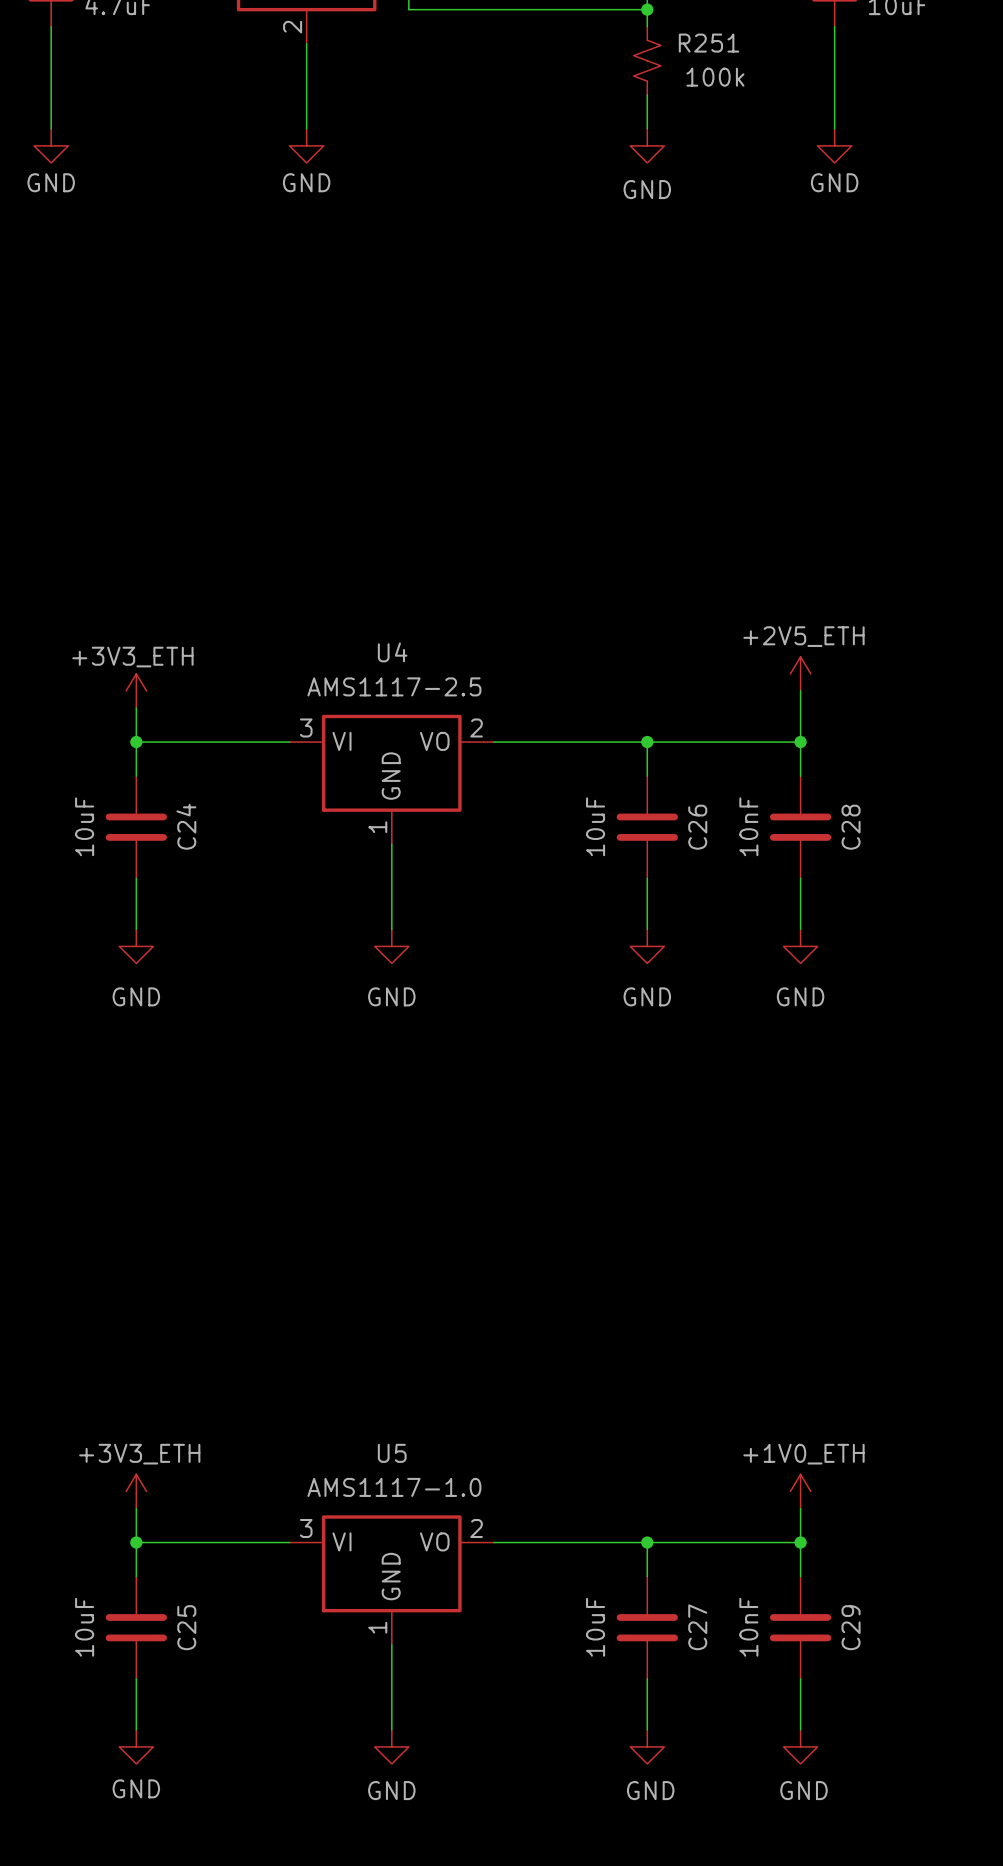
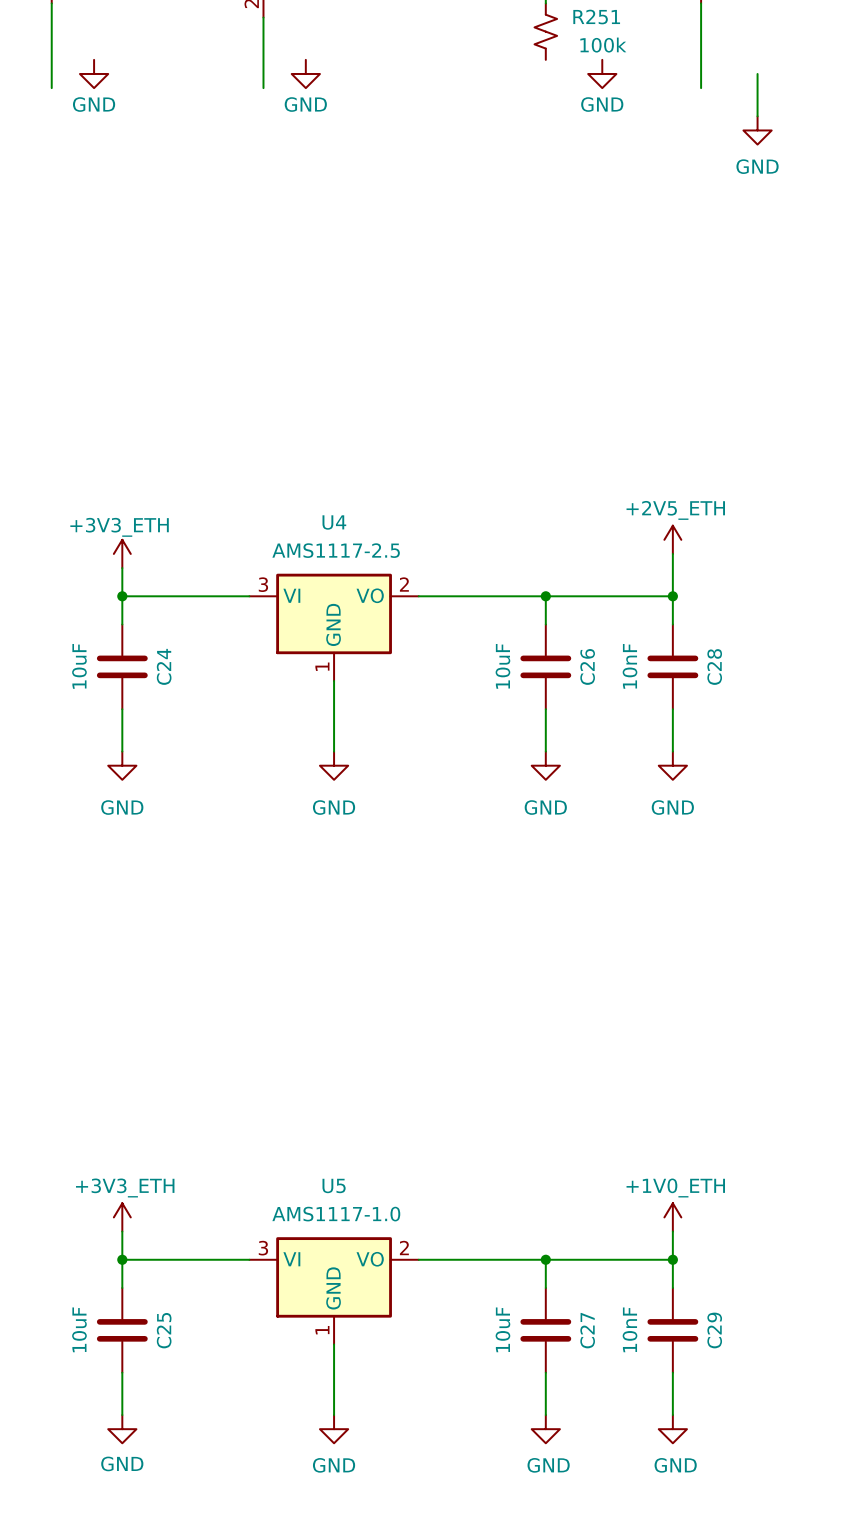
wire: (647, 94) (647, 128) -> none
power symbol: none -> GND (602, 73)
wire: none -> (757, 73) (757, 116)
power symbol position: GND (51, 145) -> GND (94, 73)
power symbol position: GND (306, 145) -> GND (305, 73)
power symbol: GND (647, 145) -> none
power symbol: GND (834, 145) -> none
power symbol: none -> GND (757, 130)

